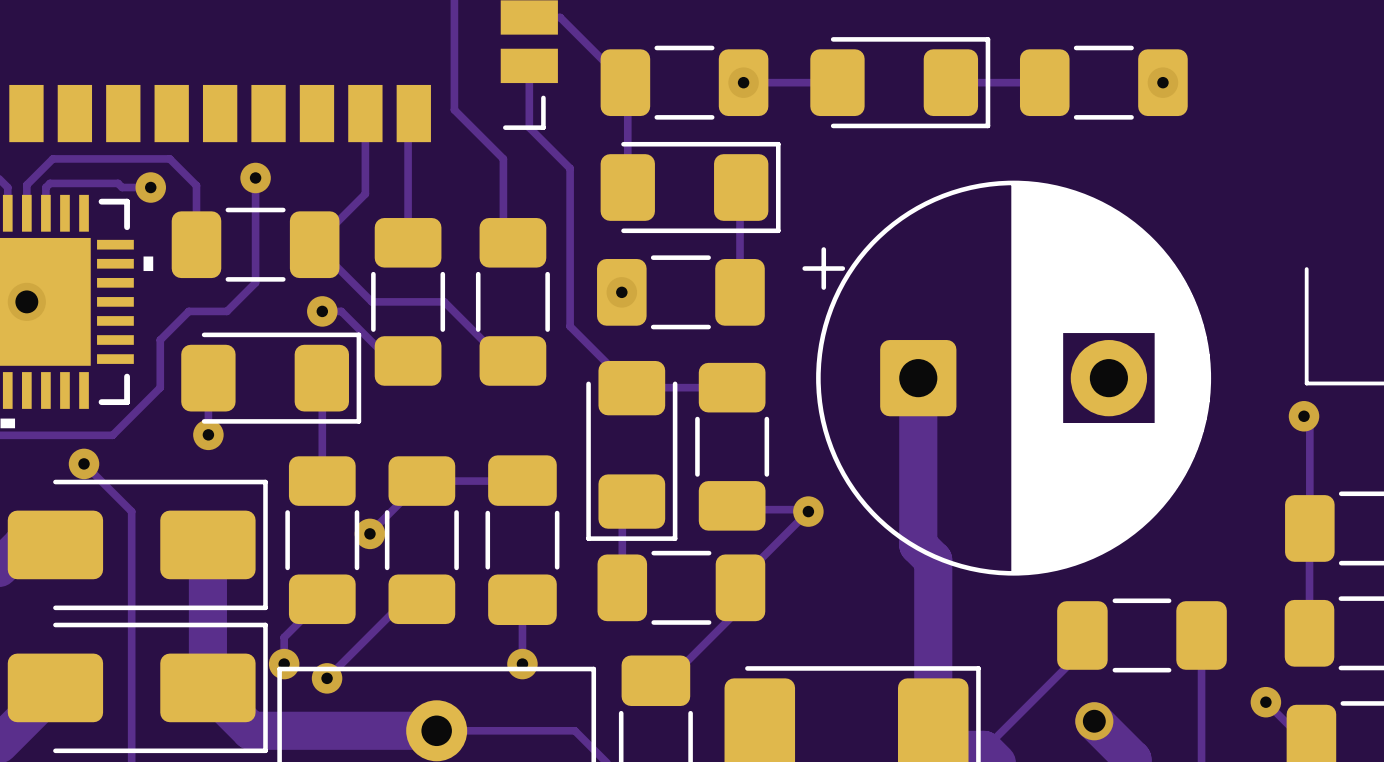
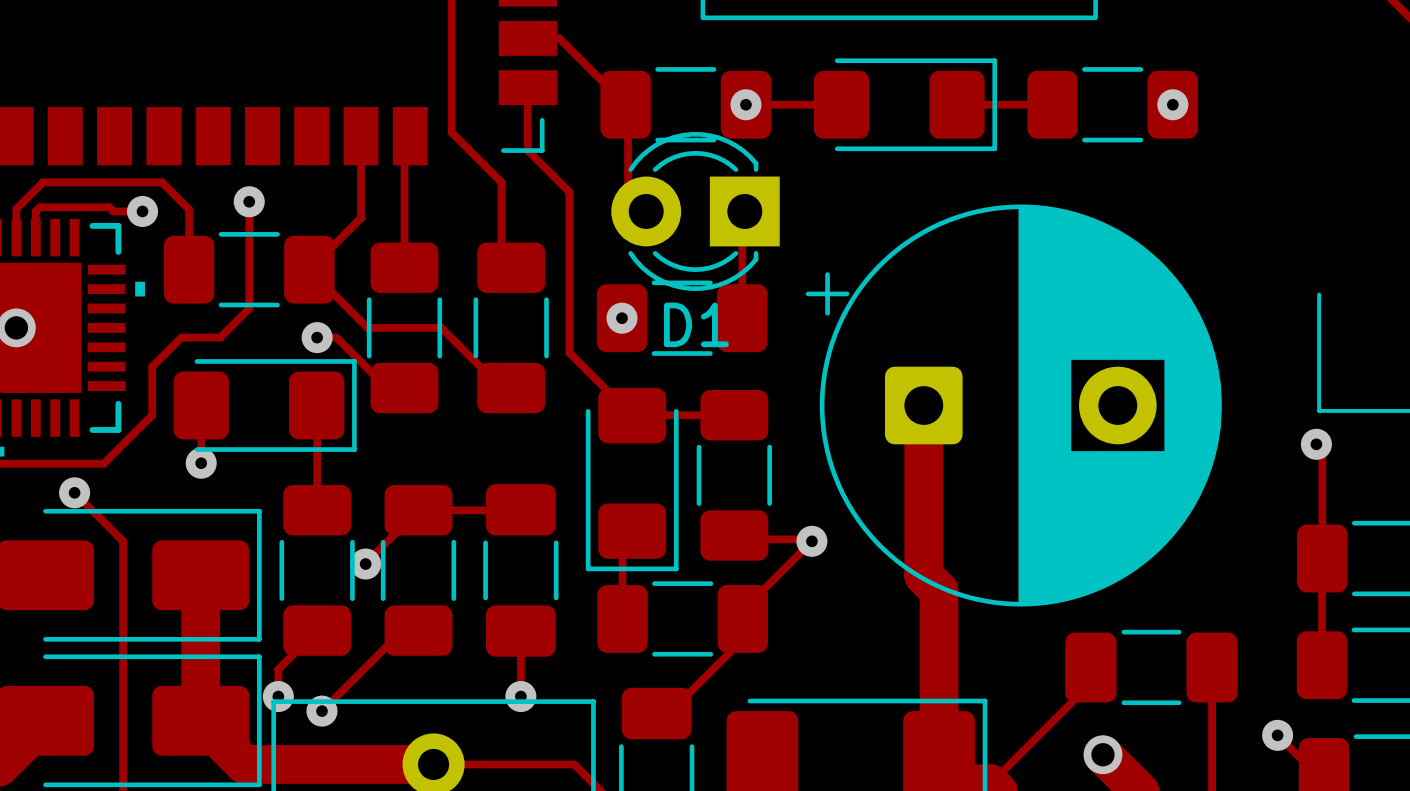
part: (690, 187) -> none
D1: none -> (695, 211)

